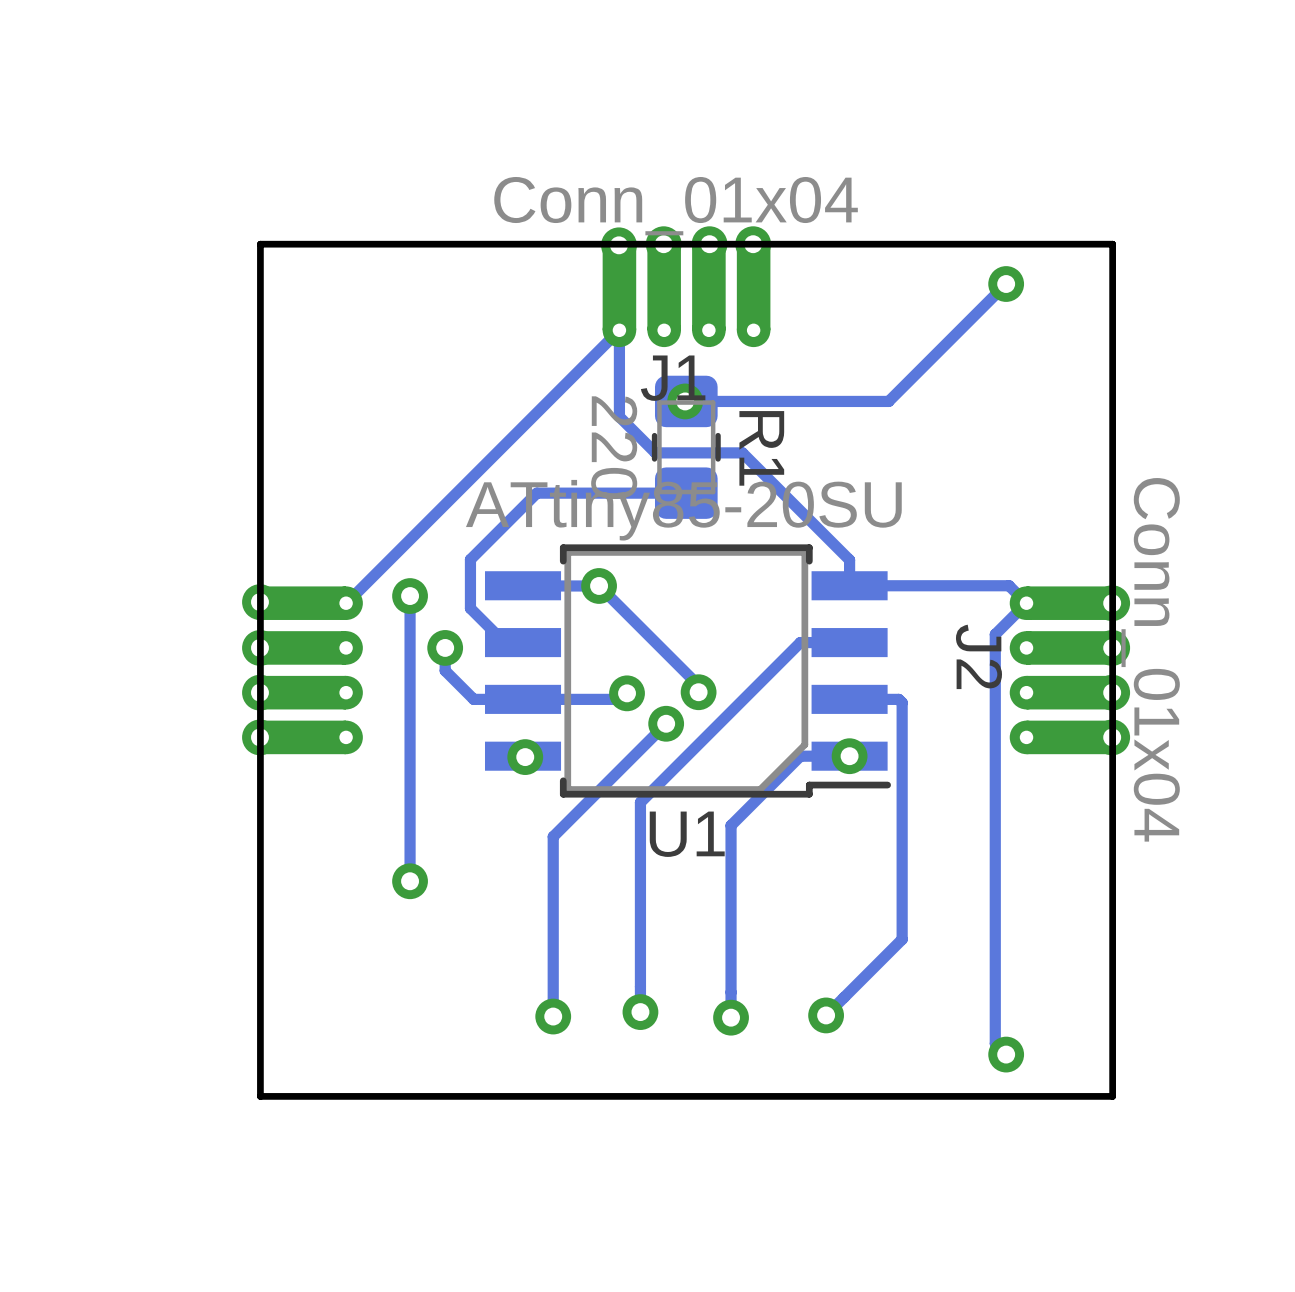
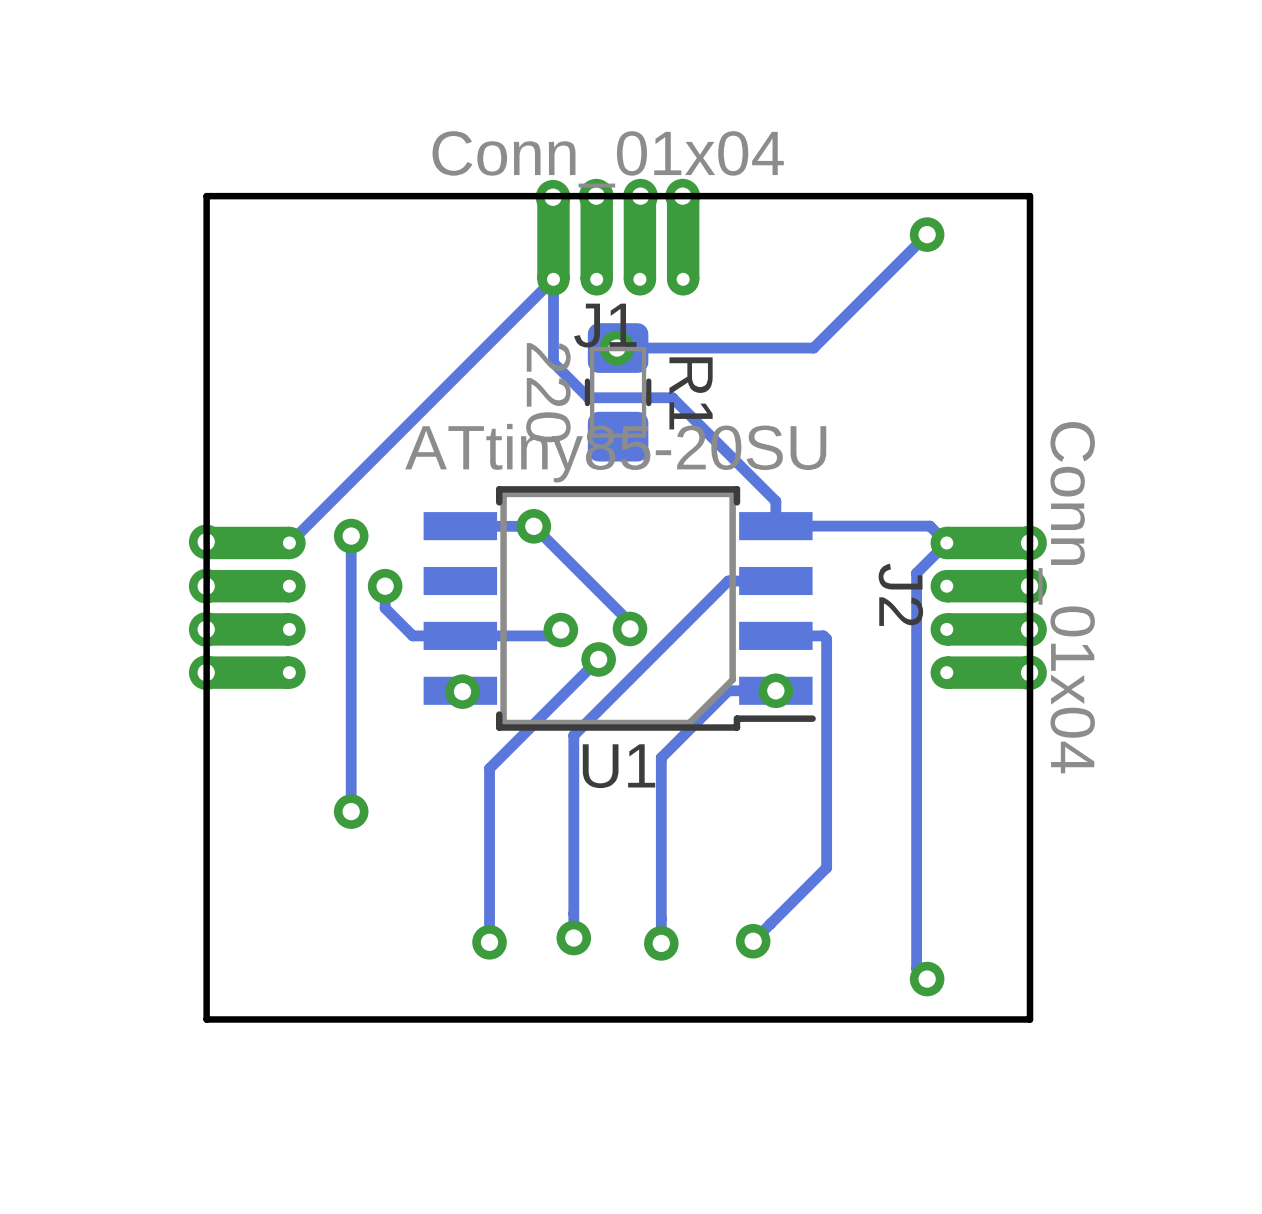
track: (686, 493) (536, 493) (470, 559) (470, 608) (504, 642) (523, 642) -> none

